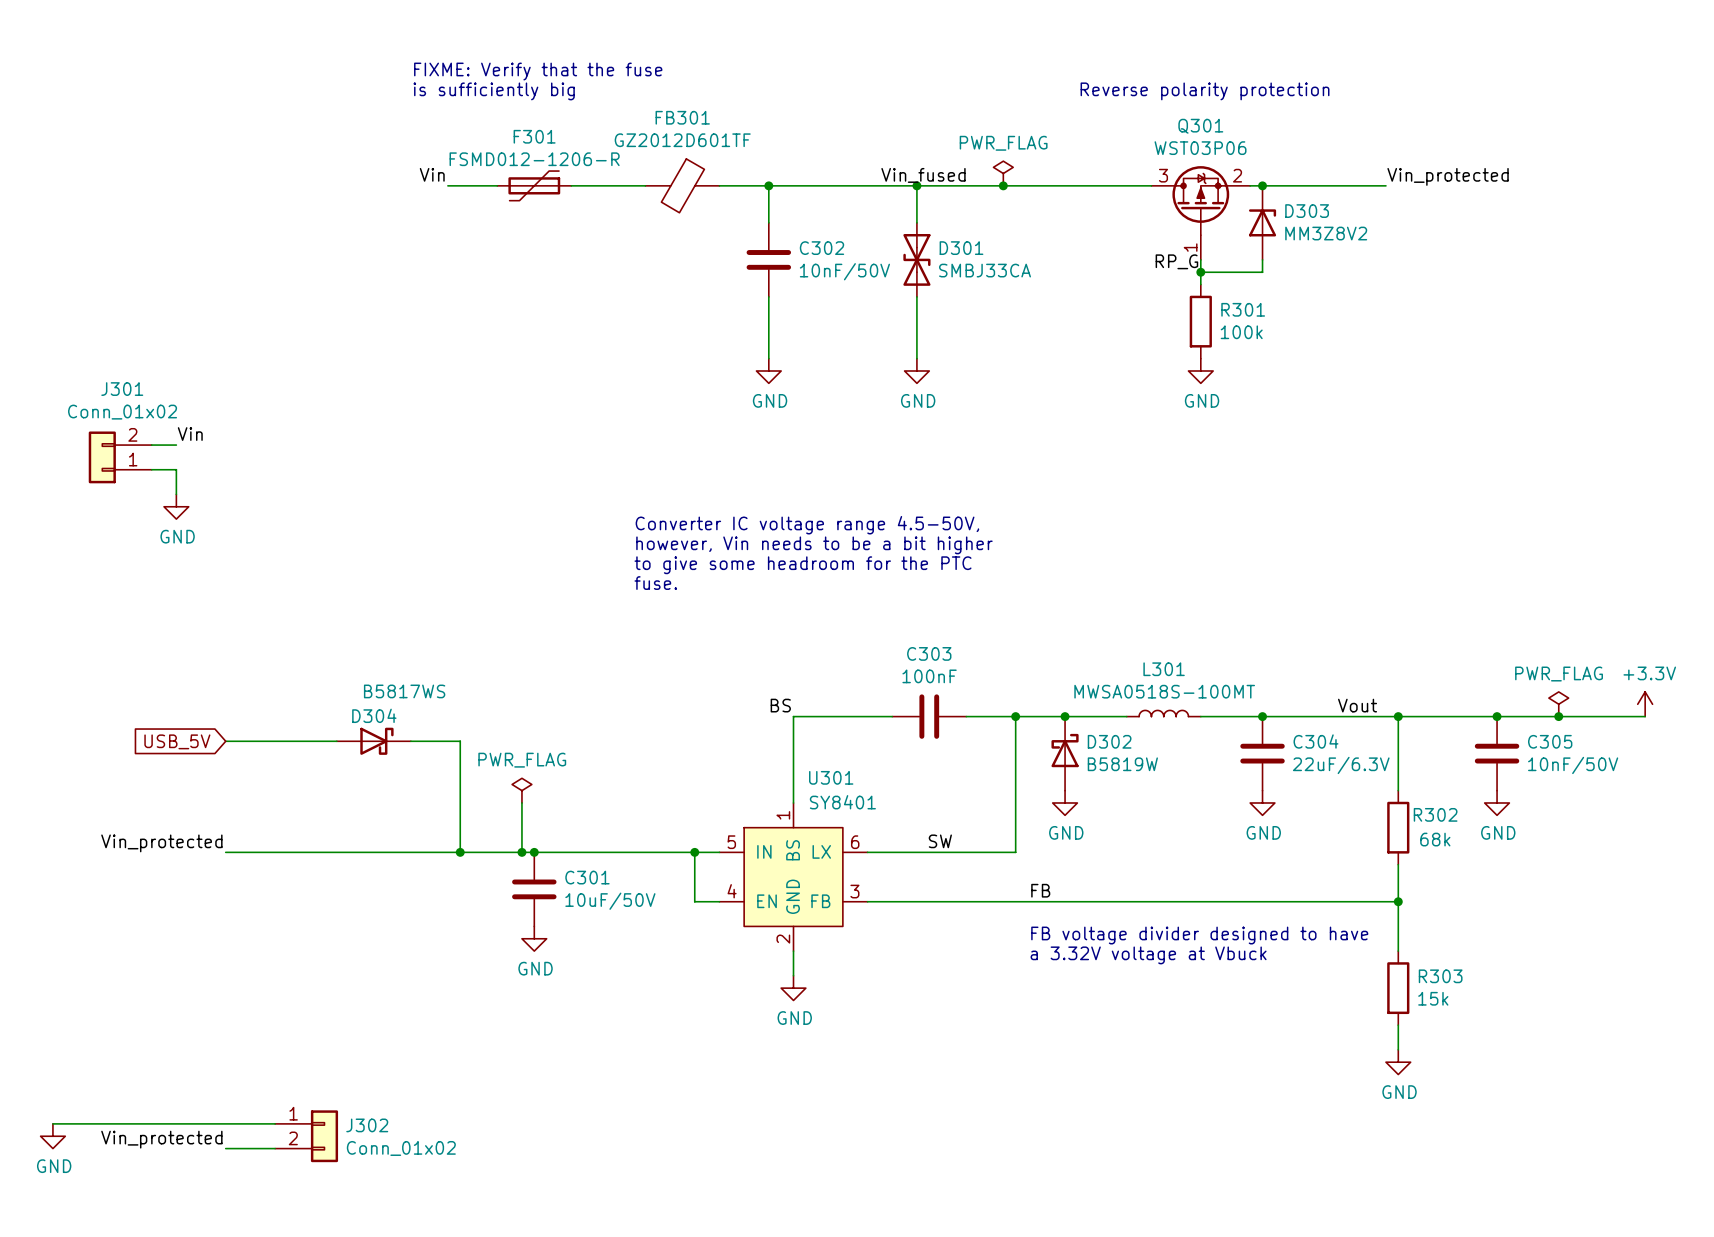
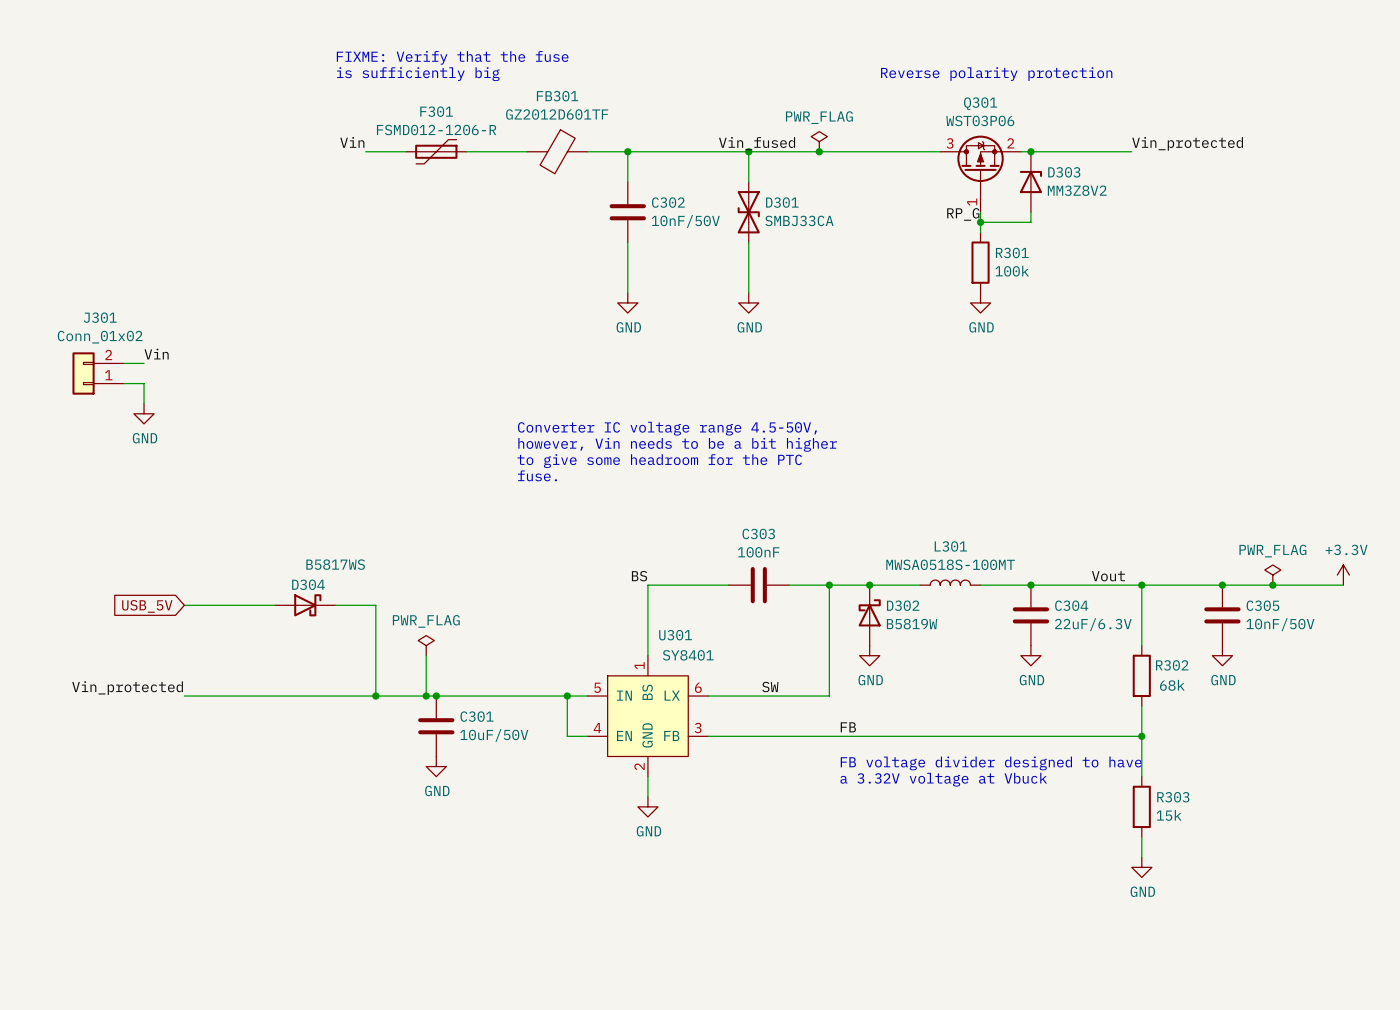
wire: (52, 1123) (275, 1123) -> none
power symbol: GND (52, 1136) -> none
J302: Conn_01x02 (306, 1136) -> none
label: Vin_protected (161, 1139) -> none
wire: (225, 1148) (275, 1148) -> none

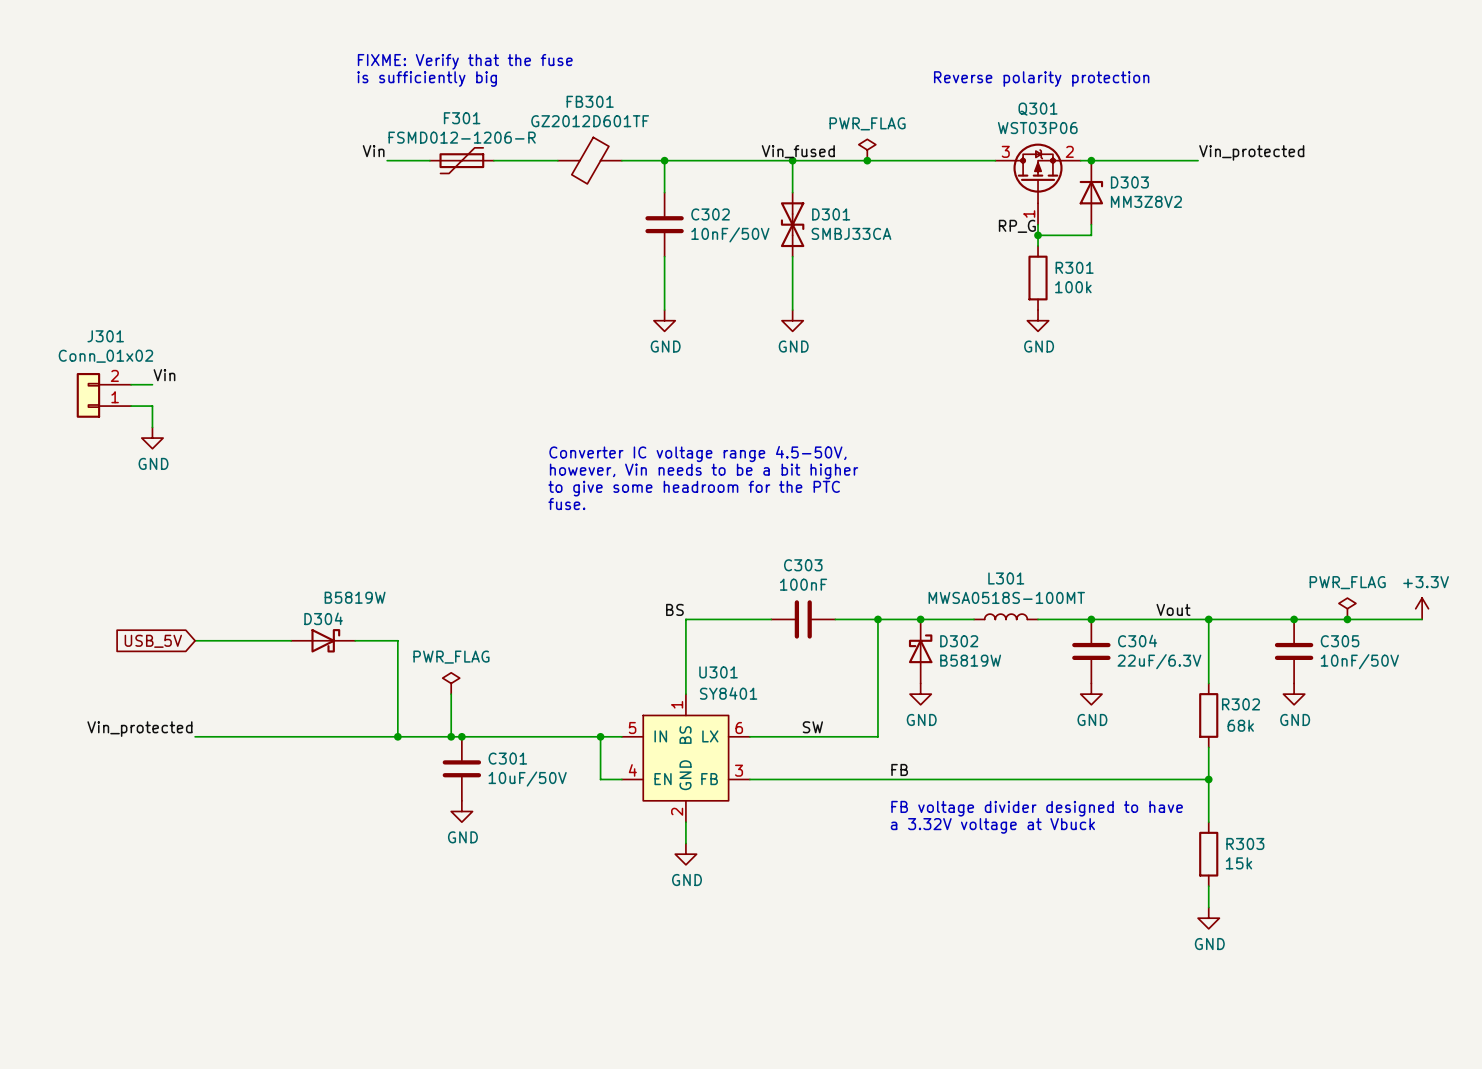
D304 value: B5817WS (335, 564) -> B5819W (355, 597)

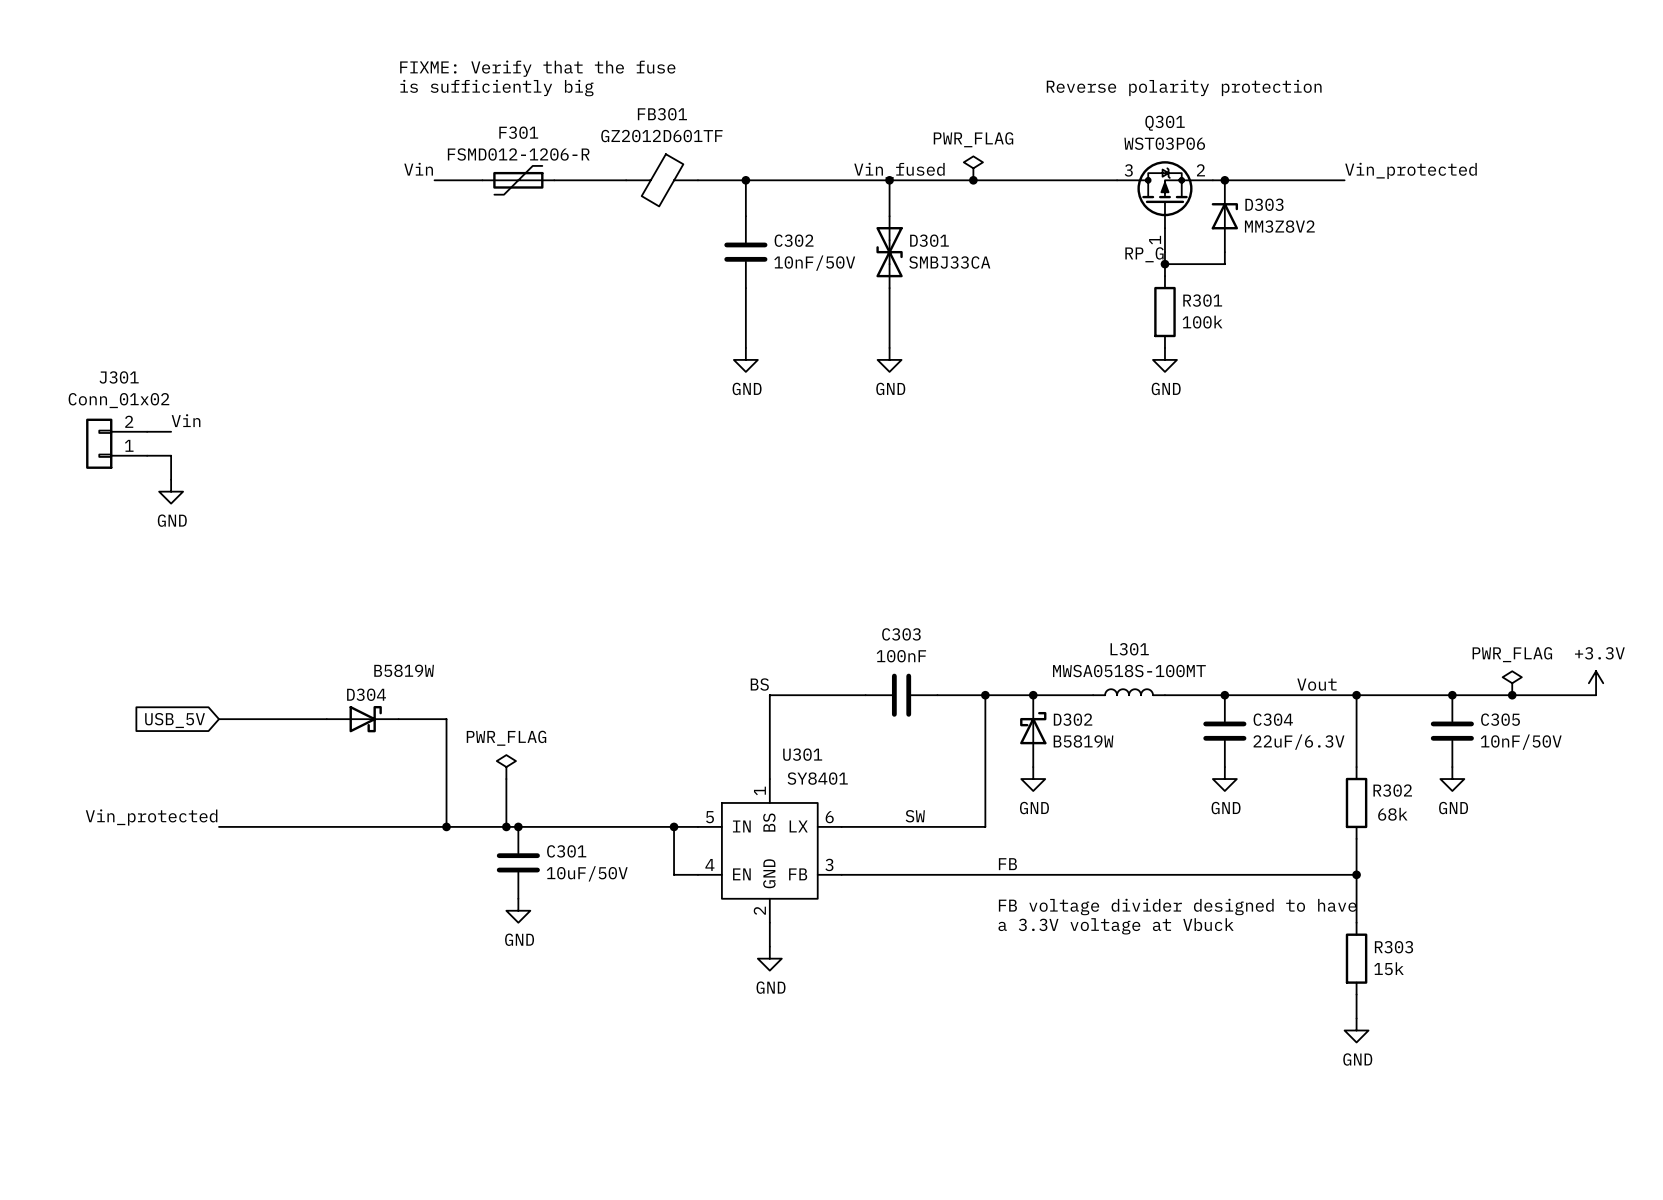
text: Converter IC voltage range 4.5-50V, (697, 454) -> none
text: however, Vin needs to be a bit higher (704, 471) -> none
text: to give some headroom for the PTC (694, 488) -> none
text: fuse. (566, 504) -> none
text: a 3.32V voltage at Vbuck (992, 825) -> a 3.3V voltage at Vbuck (1116, 926)

